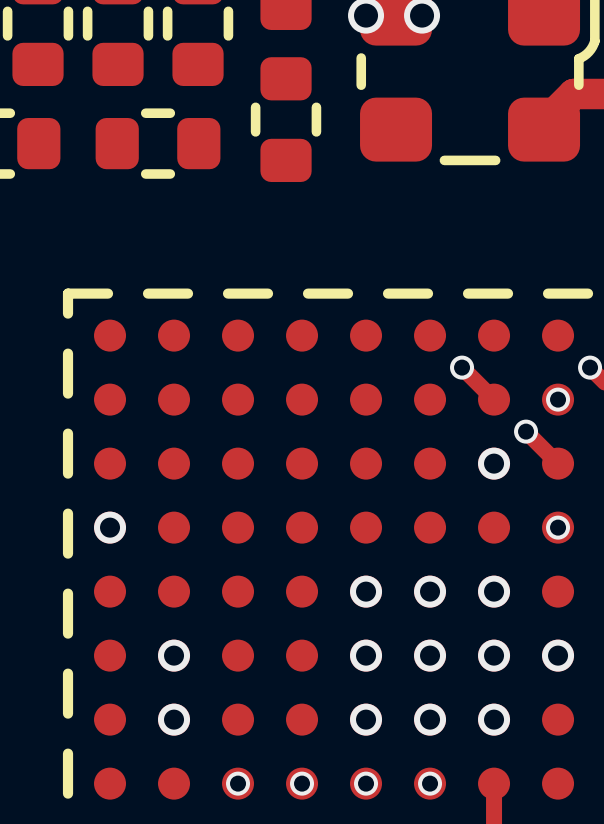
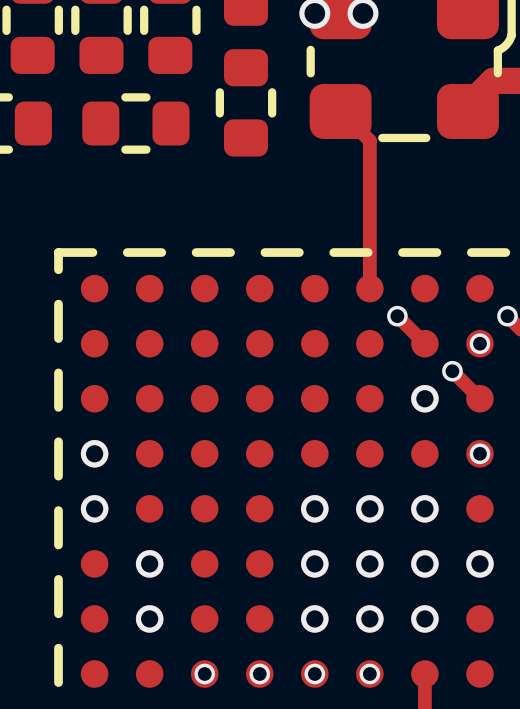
track: none -> (340, 111) (369, 140) (369, 288)
via: none -> (94, 508)

